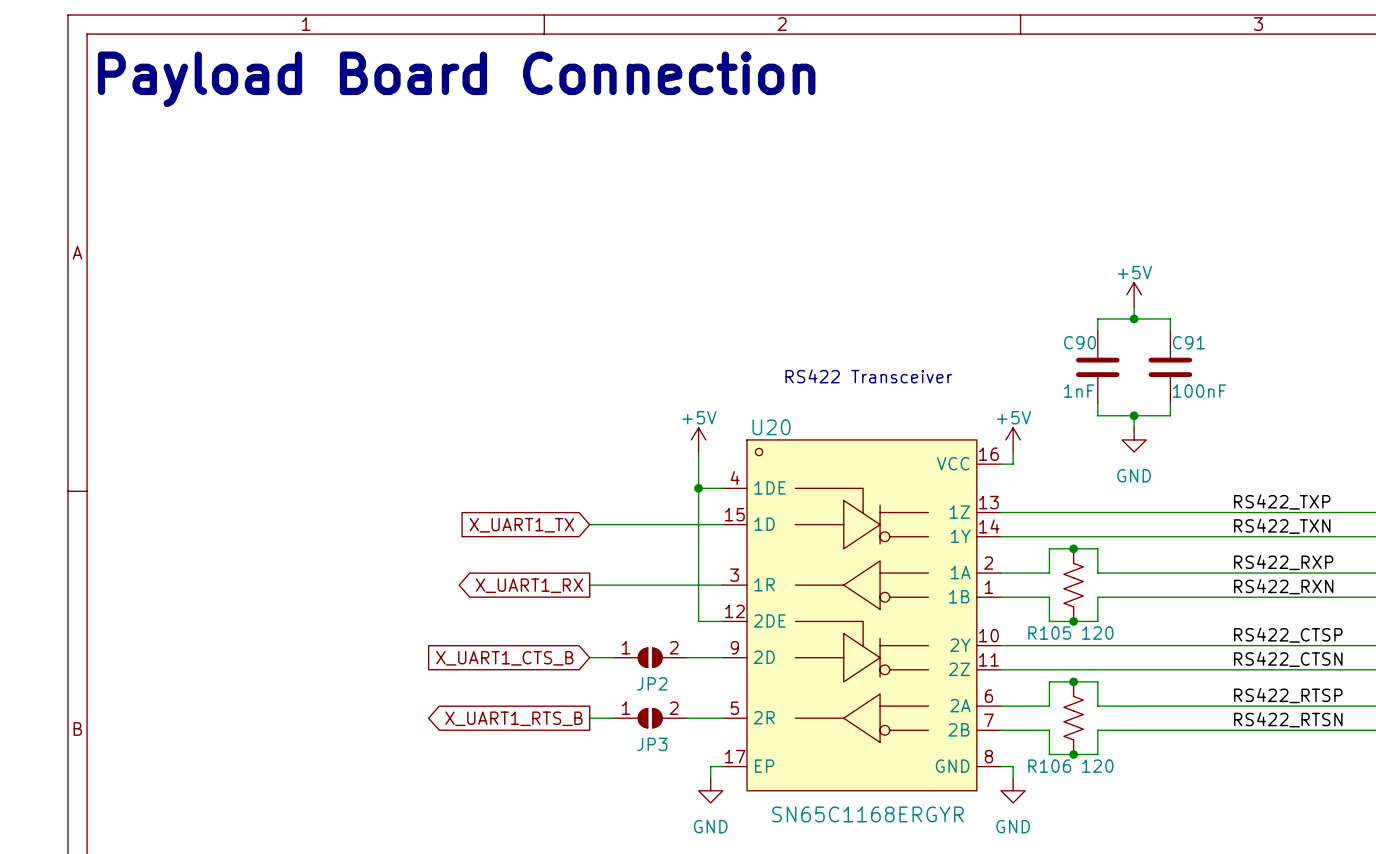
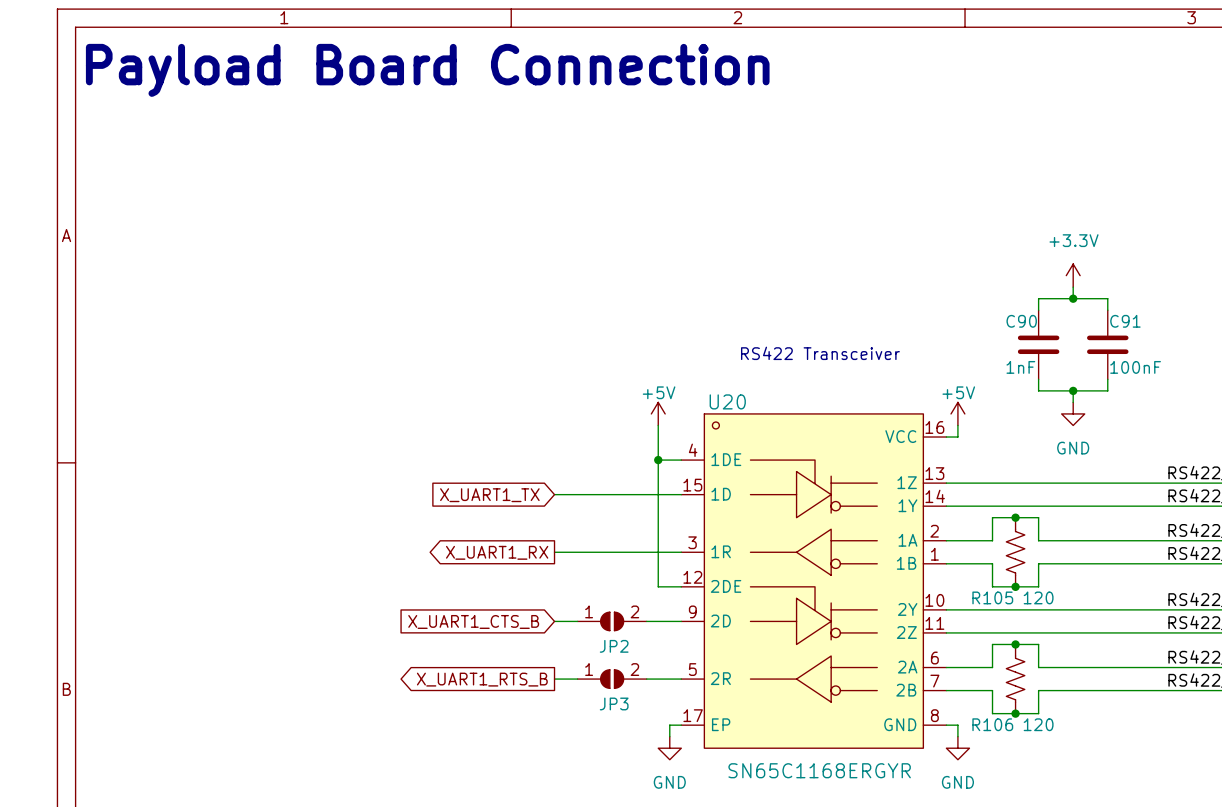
power symbol: +5V (1134, 294) -> +3.3V (1073, 275)

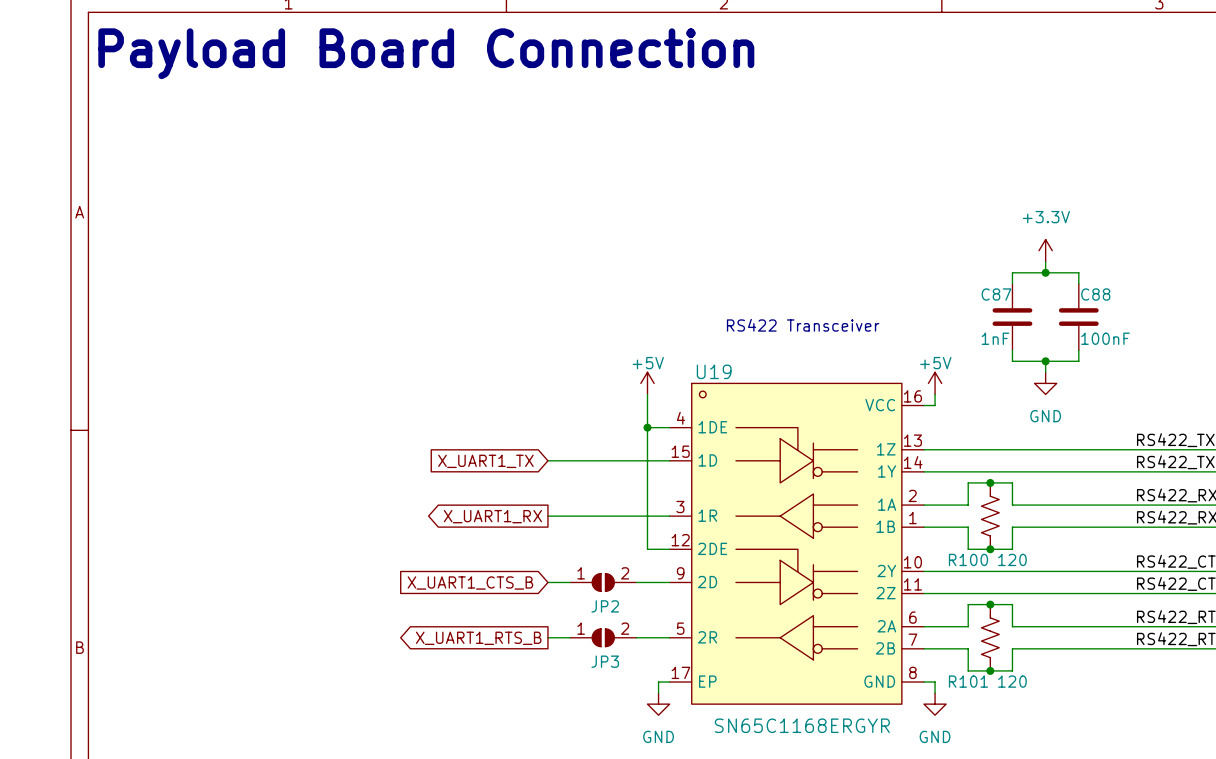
C90 name: C90 (1021, 321) -> C87 (996, 294)
C91 name: C91 (1125, 321) -> C88 (1095, 294)
U20 name: U20 (727, 401) -> U19 (714, 371)
R105 name: R105 (992, 597) -> R100 (968, 559)
R106 name: R106 (992, 724) -> R101 (968, 681)

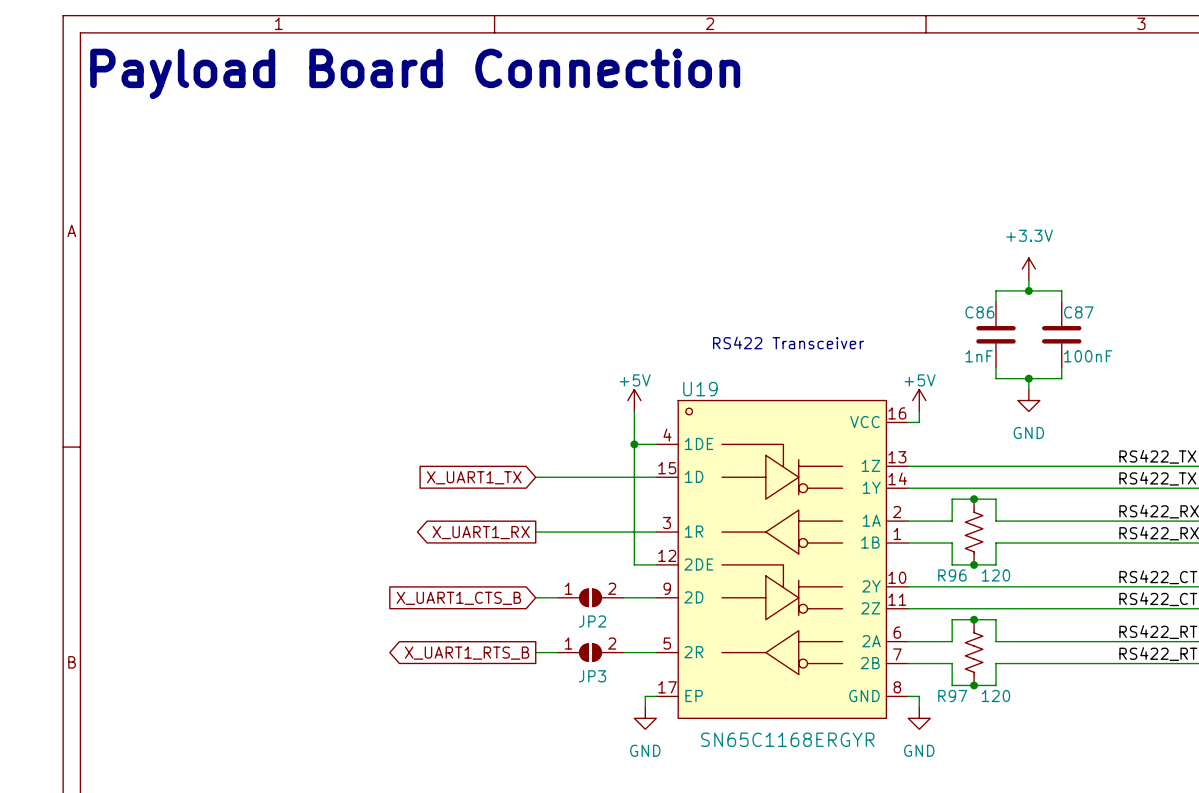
C87 name: C87 (996, 294) -> C86 (979, 312)
C88 name: C88 (1095, 294) -> C87 (1078, 312)
R100 name: R100 (968, 559) -> R96 (952, 575)
R101 name: R101 (968, 681) -> R97 (952, 696)

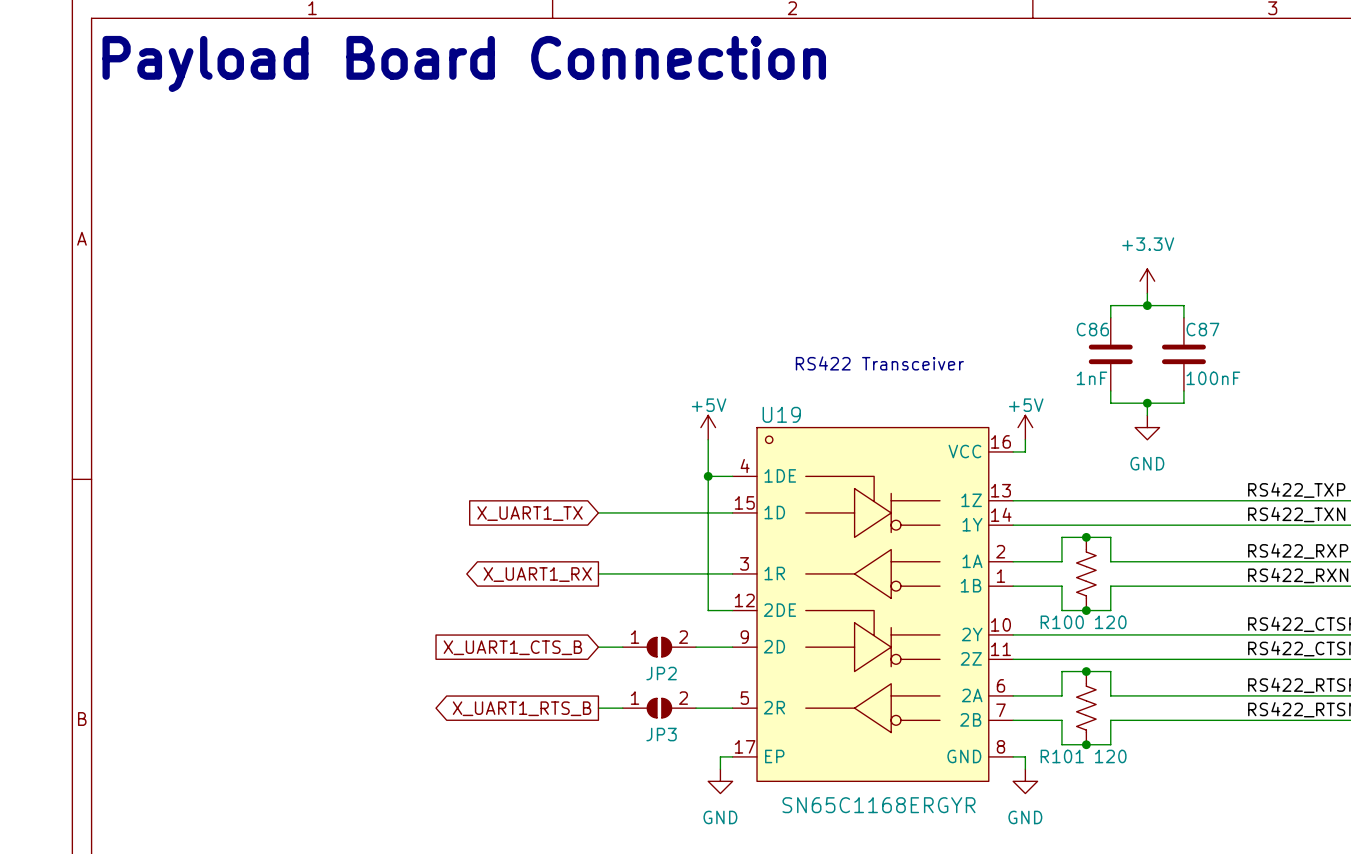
R96 name: R96 (952, 575) -> R100 (1062, 622)
R97 name: R97 (952, 696) -> R101 (1062, 756)

